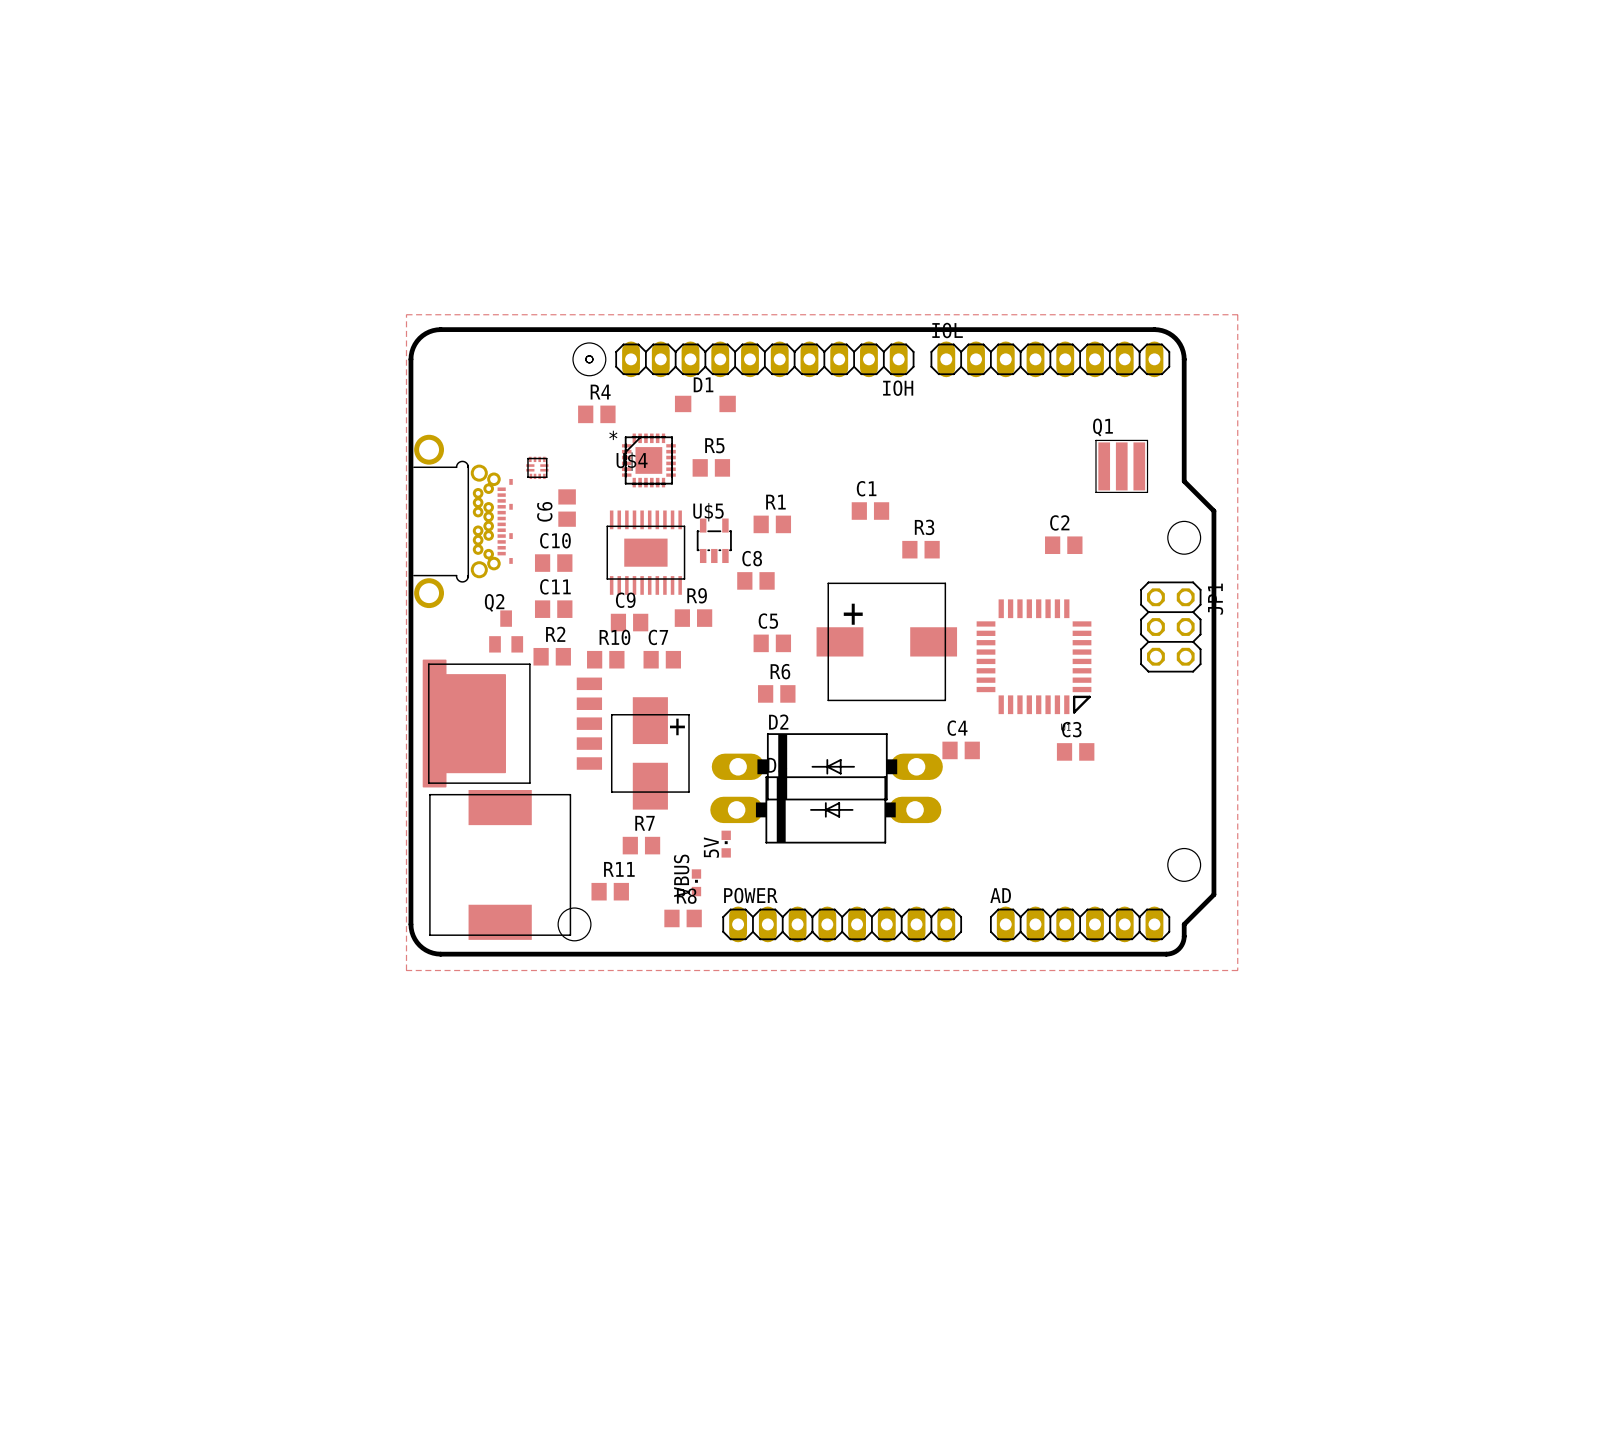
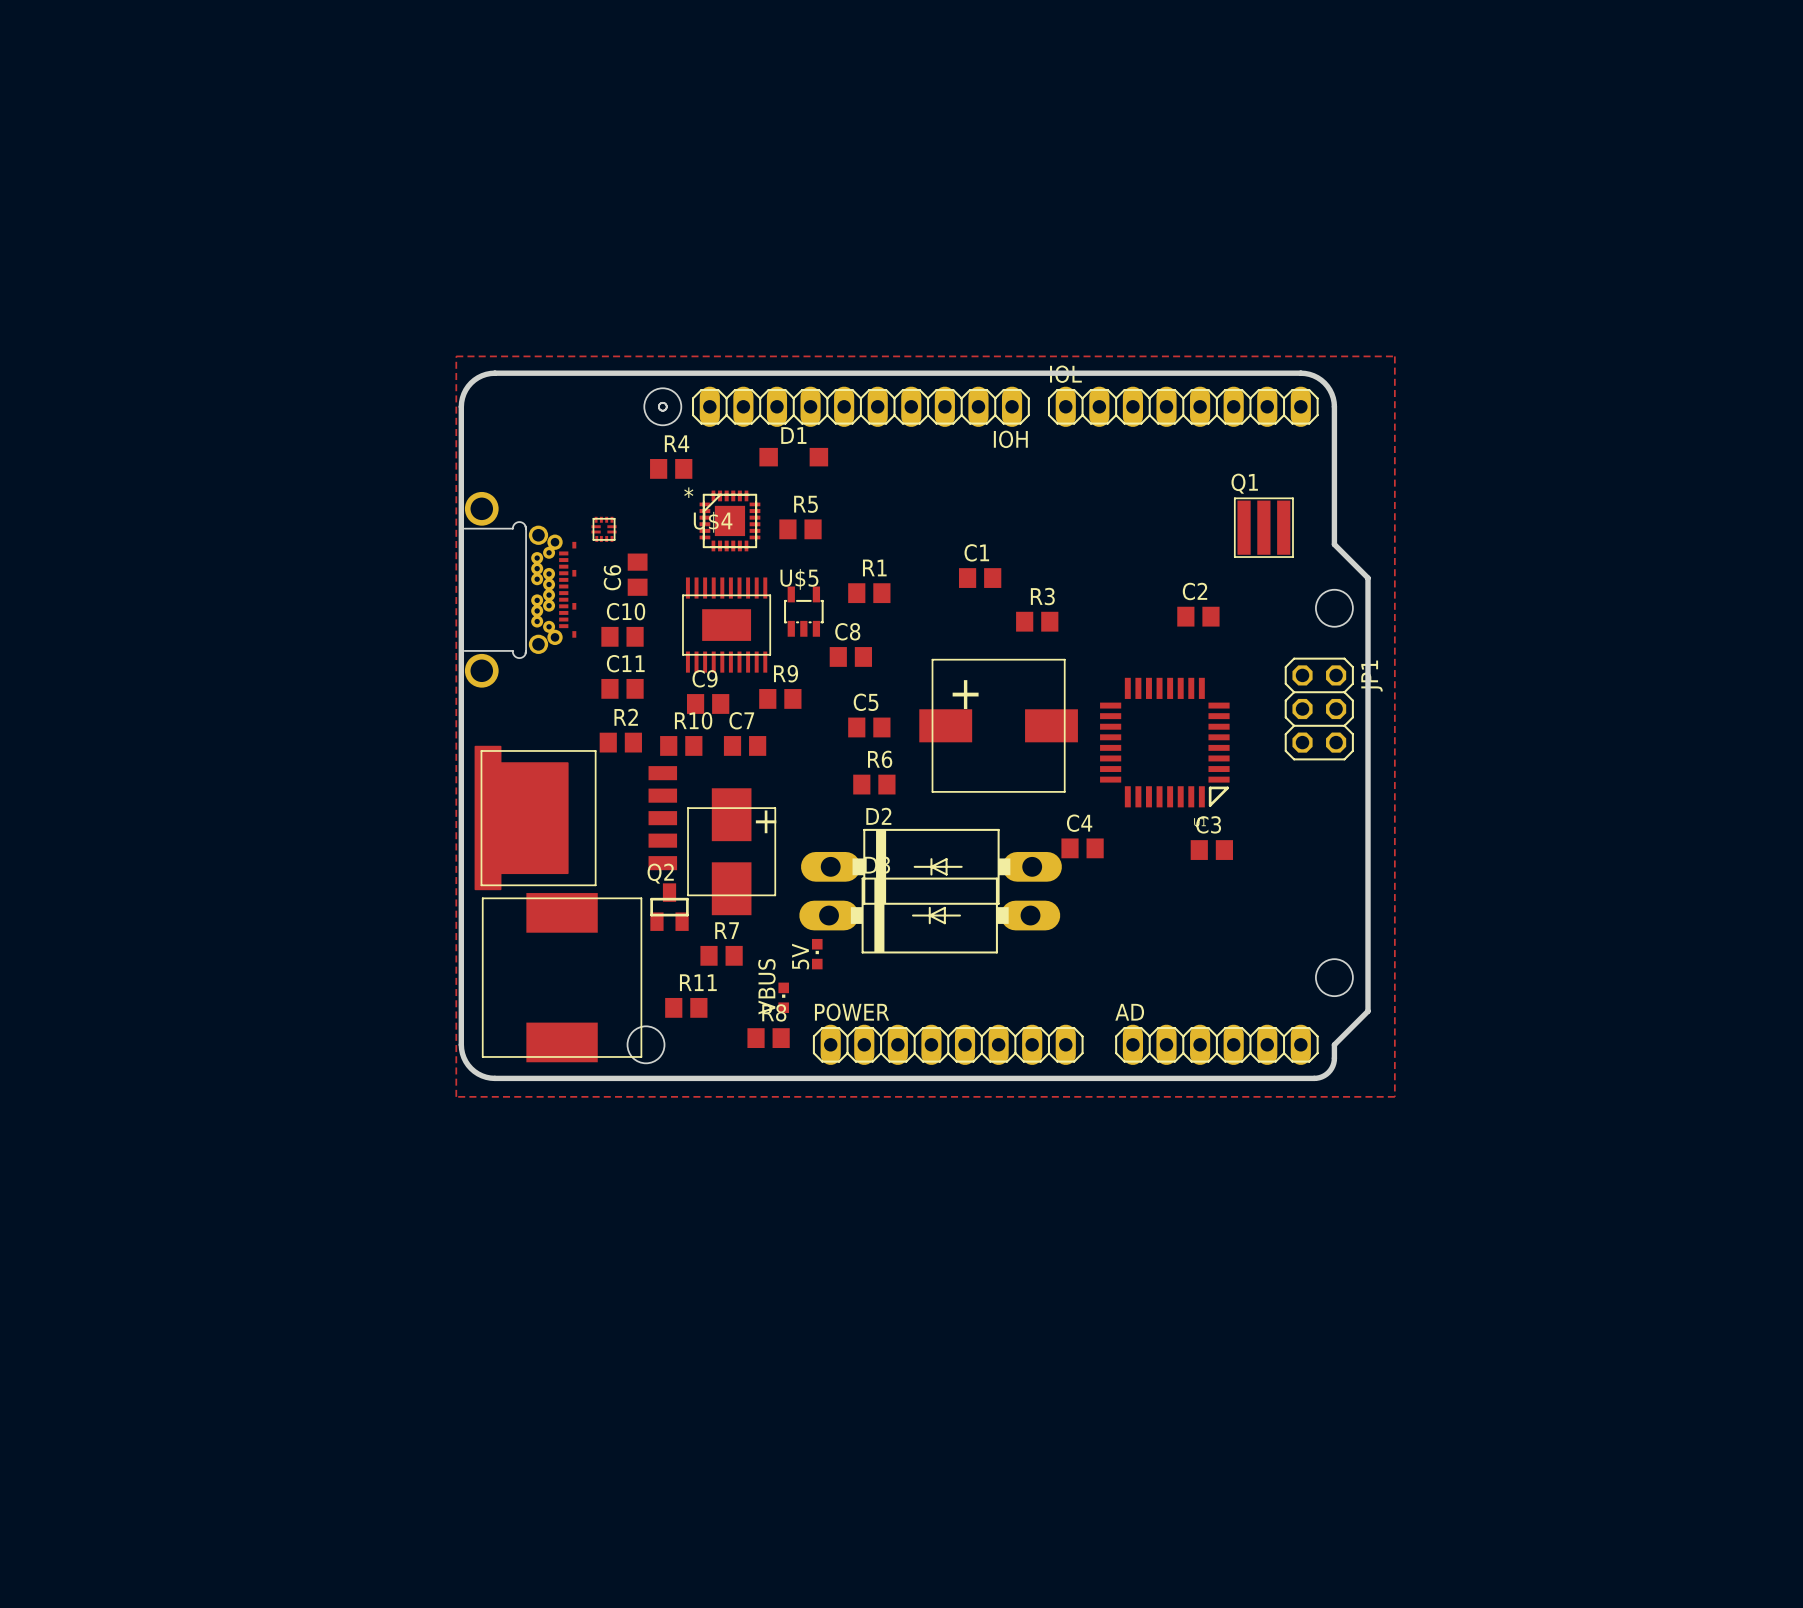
Q2 footprint: [489, 610, 524, 653] -> [650, 883, 689, 931]

